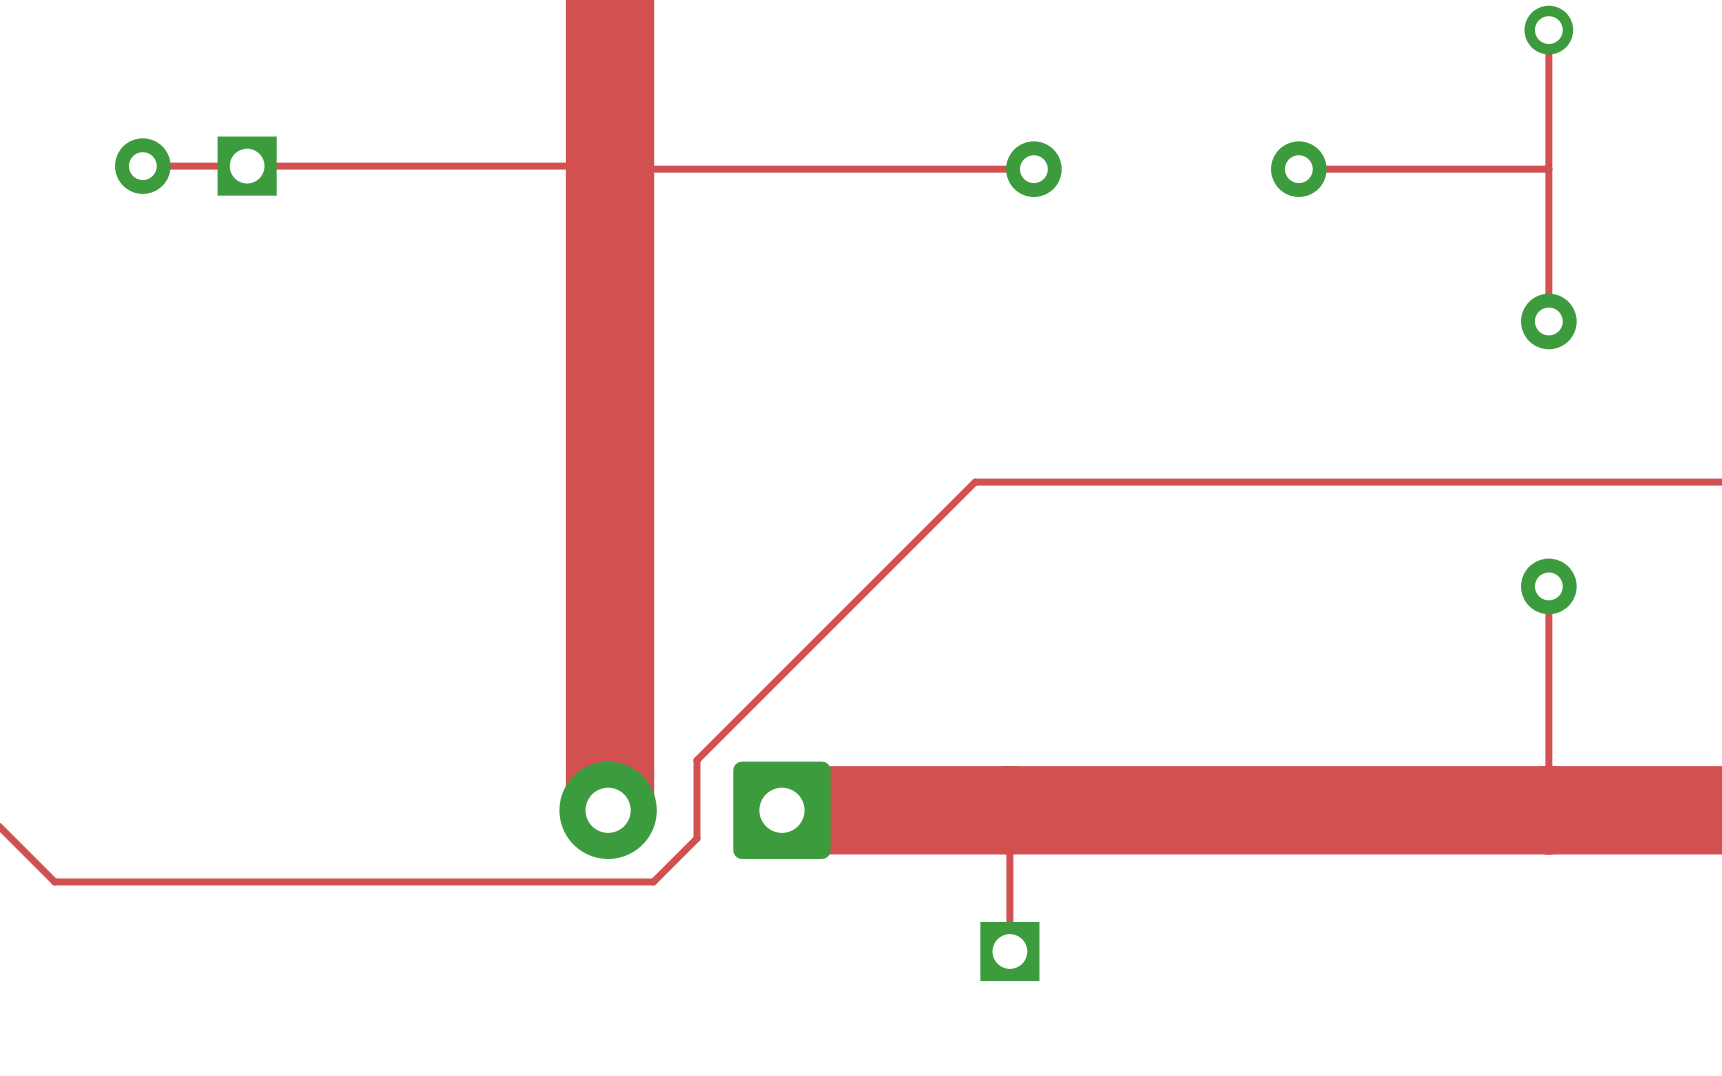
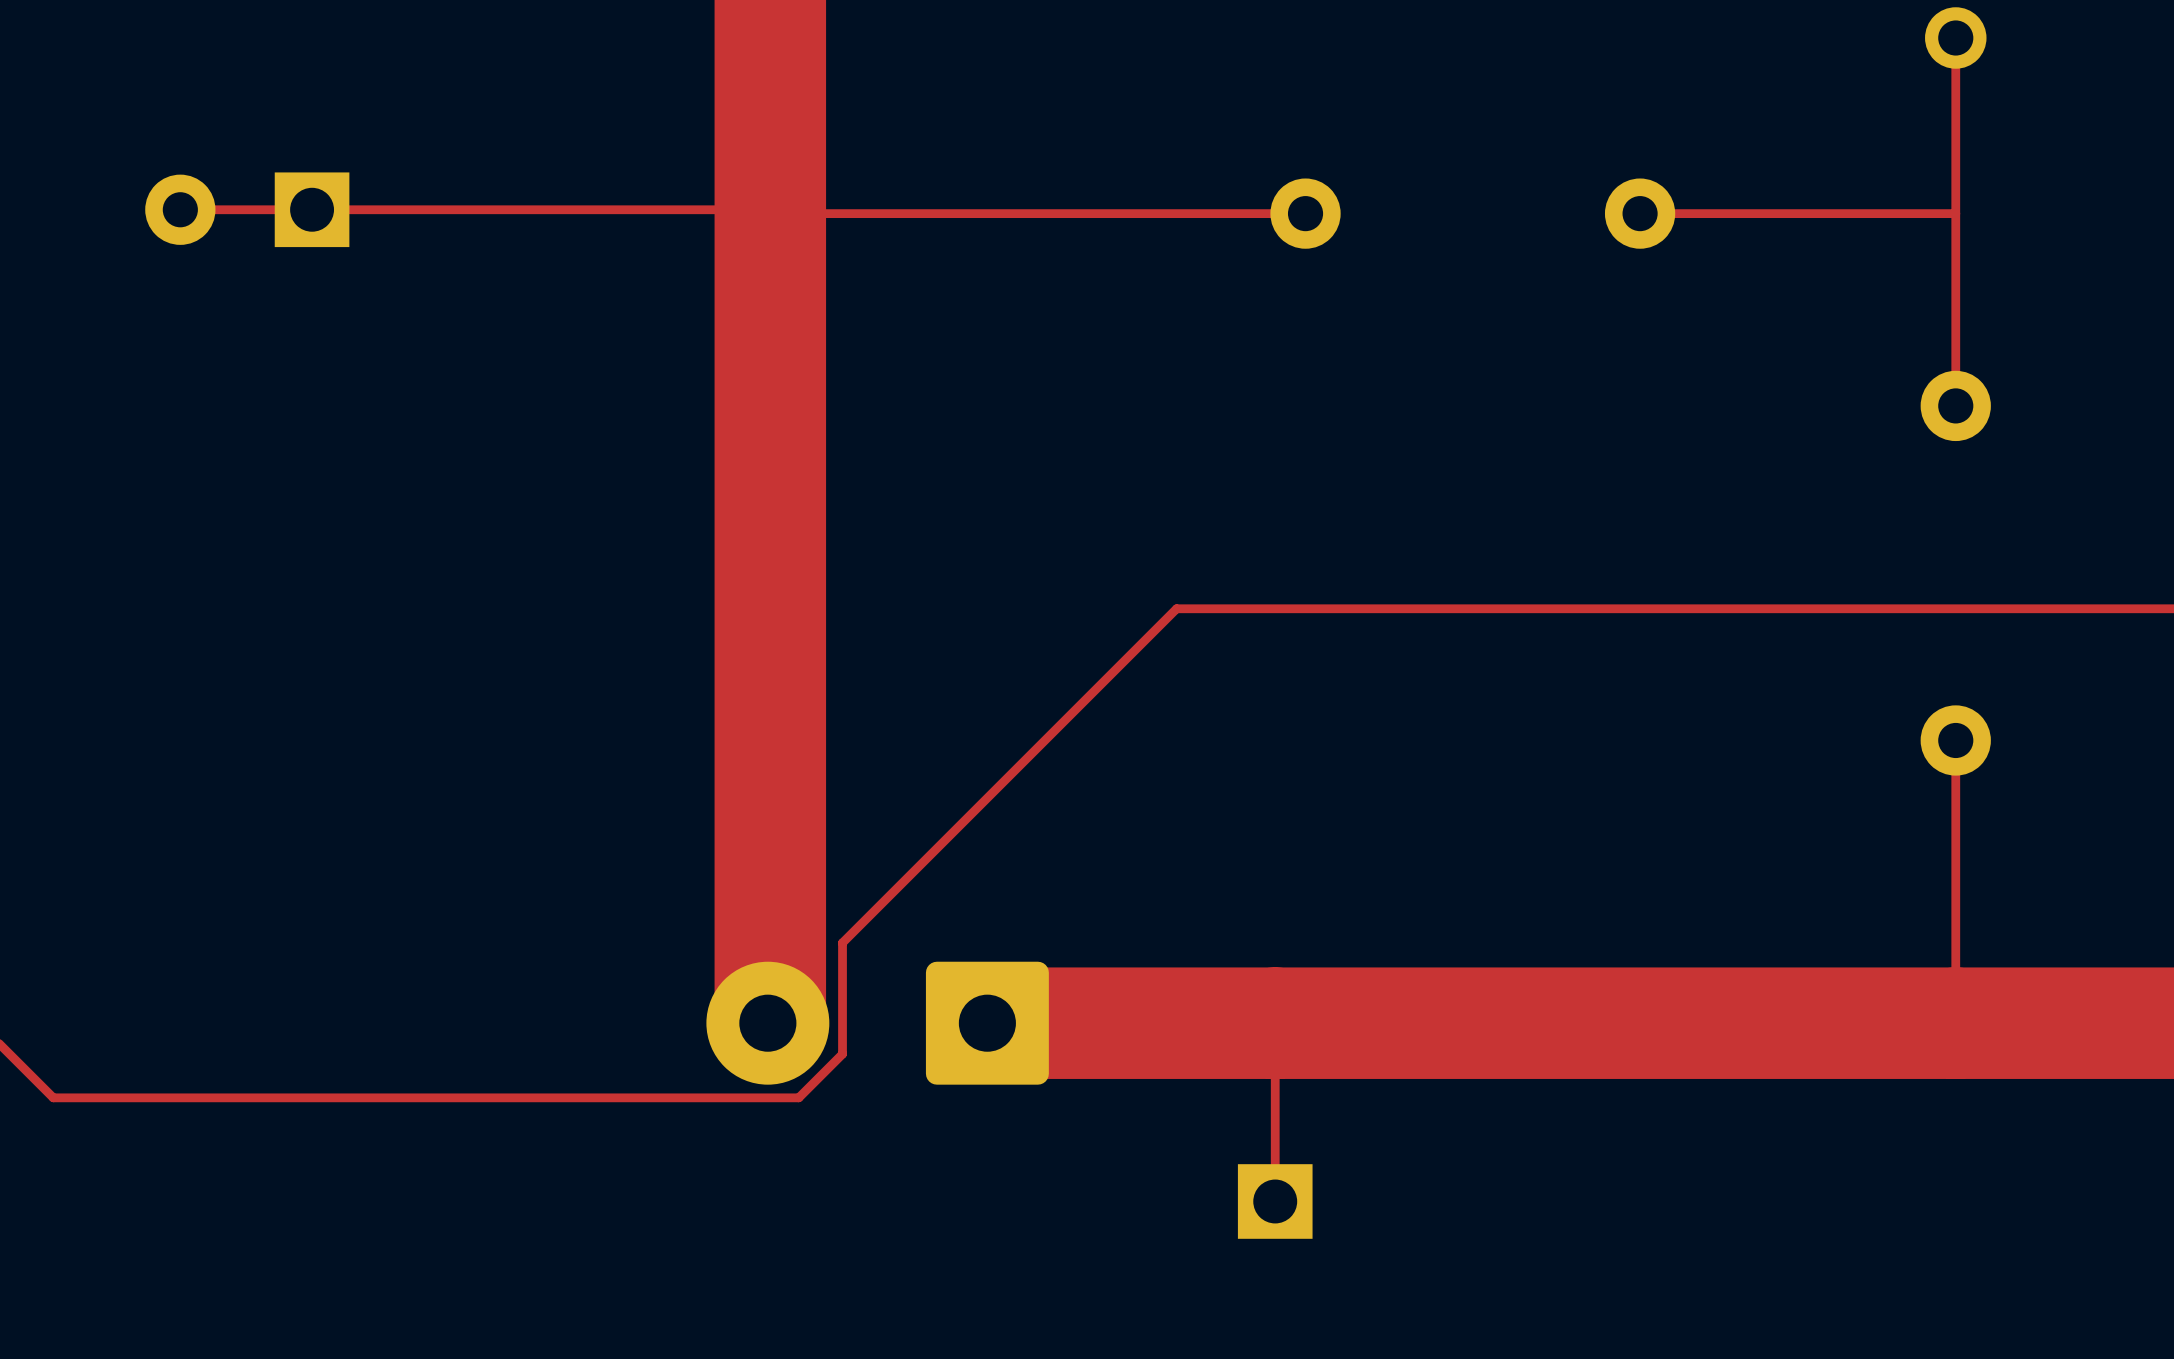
top track: (975, 482) (696, 760) (696, 838) (653, 881) (54, 881) (42, 869) -> (1231, 608) (1176, 608) (842, 942) (842, 1054) (798, 1097) (53, 1097)

